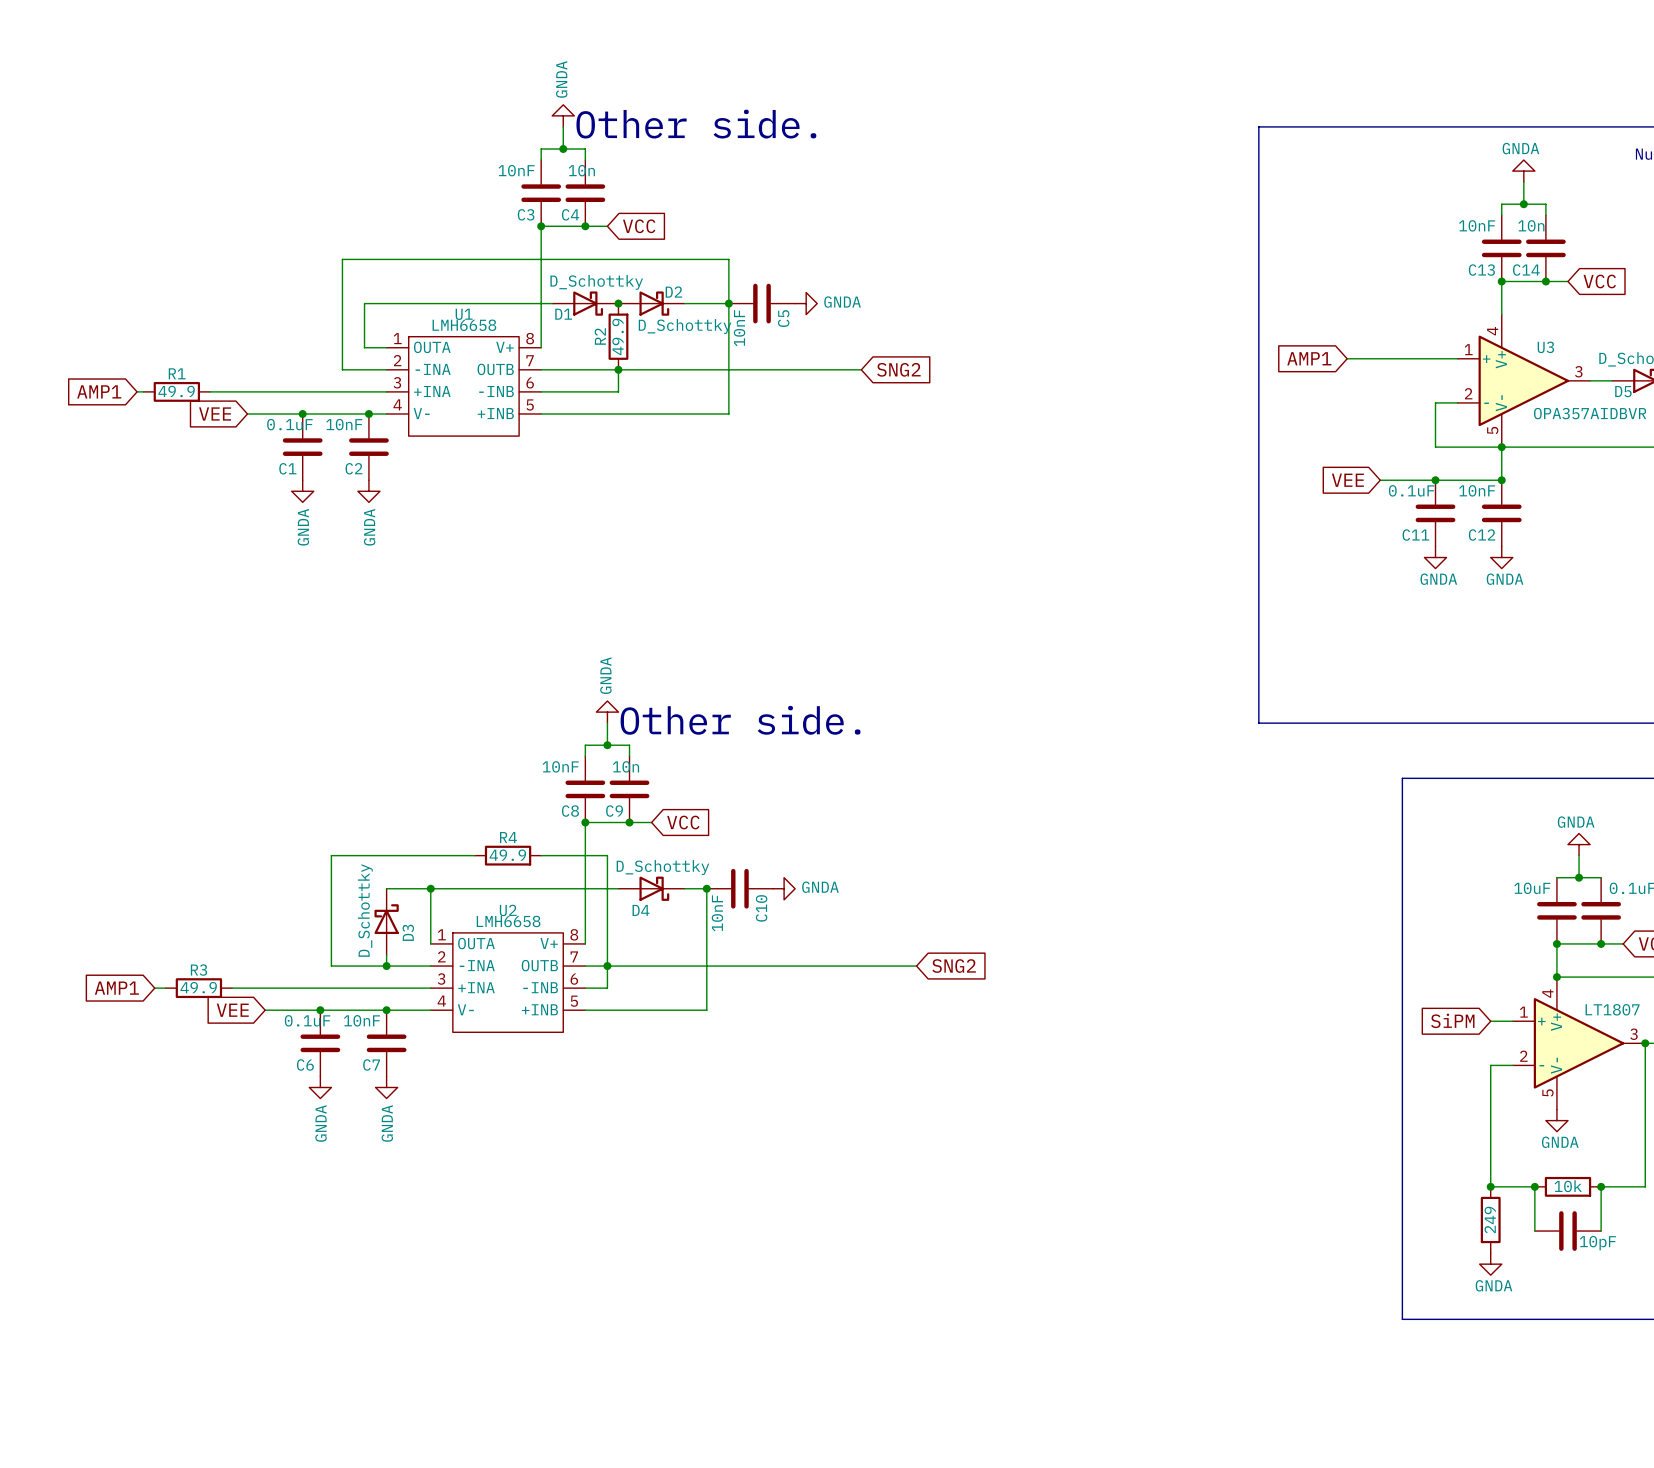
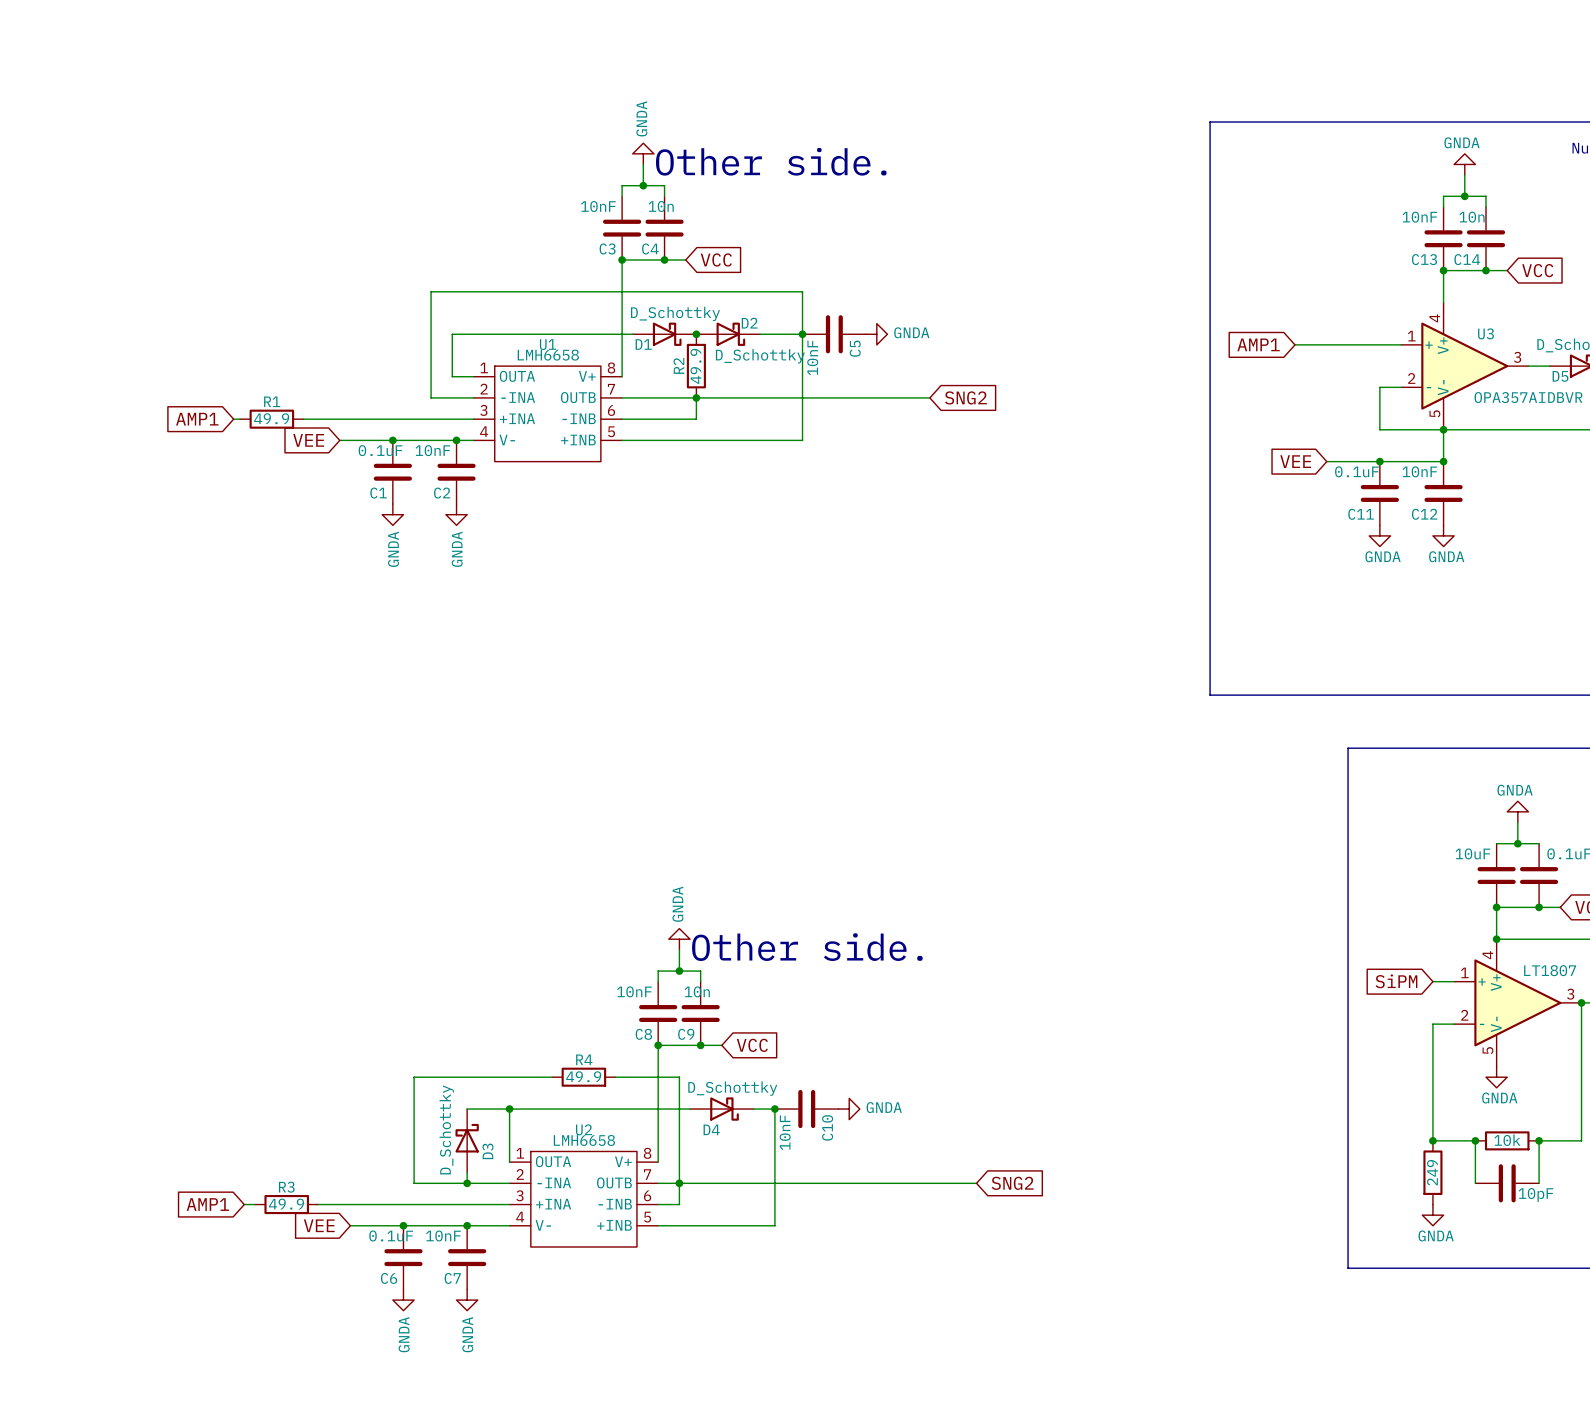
power symbol: GNDA (563, 115) -> none
text position: Other side. (696, 124) -> Other side. (771, 161)
wire: (563, 126) (563, 149) -> (643, 164) (643, 185)
junction: (563, 149) -> none
wire: (541, 160) (541, 149) (585, 149) (585, 160) -> (622, 196) (622, 185) (664, 185) (664, 196)
power symbol: none -> GNDA (643, 153)
C3 position: (541, 193) -> (622, 228)
C4 position: (585, 193) -> (664, 228)
junction: none -> (643, 185)
junction: (541, 226) -> none
junction: (585, 226) -> none
wire: (607, 226) (541, 226) (541, 347) -> (685, 259) (622, 259) (622, 376)
global label position: VCC (639, 226) -> VCC (716, 259)
junction: none -> (622, 259)
junction: none -> (664, 259)
wire: (448, 303) (364, 303) (364, 347) (386, 347) -> (431, 291) (431, 397) (473, 397)
D1 position: (585, 303) -> (664, 334)
junction: (618, 303) -> none
D2 position: (651, 303) -> (728, 334)
wire: none -> (700, 291) (802, 291) (802, 440) (622, 440)
junction: (728, 303) -> none
C5 position: (762, 303) -> (834, 334)
power symbol: GNDA (806, 303) -> none
R2 position: (618, 336) -> (696, 366)
wire: none -> (632, 334) (452, 334) (452, 376) (473, 376)
junction: none -> (696, 334)
wire: none -> (760, 334) (802, 334)
junction: none -> (802, 334)
power symbol: none -> GNDA (876, 334)
wire: (386, 369) (342, 369) (342, 259) (728, 259) (728, 413) -> (929, 397) (700, 397)
wire: (541, 369) (861, 369) -> none
wire: (618, 369) (618, 391) (541, 391) -> (696, 397) (696, 419) (622, 419)
junction: (618, 369) -> none
global label position: SNG2 (898, 369) -> SNG2 (965, 397)
U1 position: (463, 386) -> (547, 413)
global label position: AMP1 (99, 391) -> AMP1 (197, 419)
wire: (137, 391) (143, 391) -> (233, 419) (240, 419)
R1 position: (176, 391) -> (271, 419)
wire: (209, 391) (386, 391) -> (303, 419) (473, 419)
global label position: VEE (215, 413) -> VEE (308, 440)
wire: (247, 413) (386, 413) -> (339, 440) (473, 440)
junction: (302, 413) -> none
junction: (368, 413) -> none
wire: (541, 413) (647, 413) -> none
junction: none -> (696, 397)
C1 position: (302, 447) -> (392, 472)
C2 position: (368, 447) -> (456, 472)
junction: none -> (392, 440)
junction: none -> (456, 440)
power symbol: GNDA (302, 491) -> none
power symbol: GNDA (368, 491) -> none
power symbol: none -> GNDA (392, 514)
power symbol: none -> GNDA (456, 514)
power symbol: GNDA (607, 712) -> none
text: Other side. (740, 720) -> none
wire: (607, 723) (607, 745) -> none
junction: (607, 745) -> none
wire: (585, 756) (585, 745) (629, 745) (629, 756) -> none
C8 position: (585, 789) -> (658, 1013)
C9 position: (629, 789) -> (700, 1013)
junction: (585, 822) -> none
junction: (629, 822) -> none
wire: (651, 822) (585, 822) (585, 943) -> none
global label: VCC (683, 822) -> none
wire: (474, 855) (331, 855) (331, 966) (430, 966) -> none
R4 position: (508, 855) -> (583, 1077)
wire: (541, 855) (607, 855) (607, 988) (585, 988) -> none
wire: (386, 888) (618, 888) -> none
wire: (430, 888) (430, 943) -> none
junction: (430, 888) -> none
D4 position: (651, 888) -> (721, 1109)
wire: (684, 888) (706, 888) (706, 988) -> none
junction: (706, 888) -> none
C10 position: (739, 888) -> (806, 1109)
power symbol rotation: 0° (784, 888) -> 90° counterclockwise (679, 939)
power symbol position: GNDA (784, 888) -> GNDA (679, 939)
D3 position: (386, 921) -> (467, 1140)
wire: (386, 955) (386, 966) -> none
junction: (386, 966) -> none
wire: (585, 966) (916, 966) -> none
junction: (607, 966) -> none
global label: SNG2 (954, 966) -> none
U2 position: (508, 982) -> (583, 1199)
text: none -> Other side. (807, 947)
global label: AMP1 (116, 988) -> none
wire: (154, 988) (165, 988) -> none
R3 position: (198, 988) -> (286, 1204)
wire: (232, 988) (430, 988) -> none
global label: VEE (232, 1010) -> none
wire: (265, 1010) (430, 1010) -> none
junction: (320, 1010) -> none
junction: (386, 1010) -> none
wire: (585, 1010) (684, 1010) -> (658, 981) (658, 971)
wire: none -> (679, 971) (700, 971) (700, 981)
junction: none -> (679, 971)
C6 position: (320, 1043) -> (403, 1257)
C7 position: (386, 1043) -> (467, 1257)
power symbol: GNDA (320, 1087) -> none
power symbol: GNDA (386, 1087) -> none
junction: none -> (658, 1045)
junction: none -> (700, 1045)
wire: none -> (721, 1045) (658, 1045) (658, 1162)
global label: none -> VCC (752, 1045)
wire: none -> (552, 1077) (414, 1077) (414, 1183) (509, 1183)
wire: none -> (615, 1077) (679, 1077) (679, 1204) (658, 1204)
wire: none -> (467, 1109) (690, 1109)
wire: none -> (509, 1109) (509, 1162)
junction: none -> (509, 1109)
wire: none -> (753, 1109) (774, 1109) (774, 1225) (658, 1225)
junction: none -> (774, 1109)
power symbol: none -> GNDA (849, 1109)
wire: none -> (467, 1172) (467, 1183)
junction: none -> (467, 1183)
wire: none -> (658, 1183) (976, 1183)
junction: none -> (679, 1183)
global label: none -> SNG2 (1012, 1183)
global label: none -> AMP1 (207, 1204)
wire: none -> (244, 1204) (254, 1204)
wire: none -> (318, 1204) (509, 1204)
global label: none -> VEE (319, 1225)
wire: none -> (350, 1225) (509, 1225)
junction: none -> (403, 1225)
junction: none -> (467, 1225)
power symbol: none -> GNDA (403, 1300)
power symbol: none -> GNDA (467, 1300)

